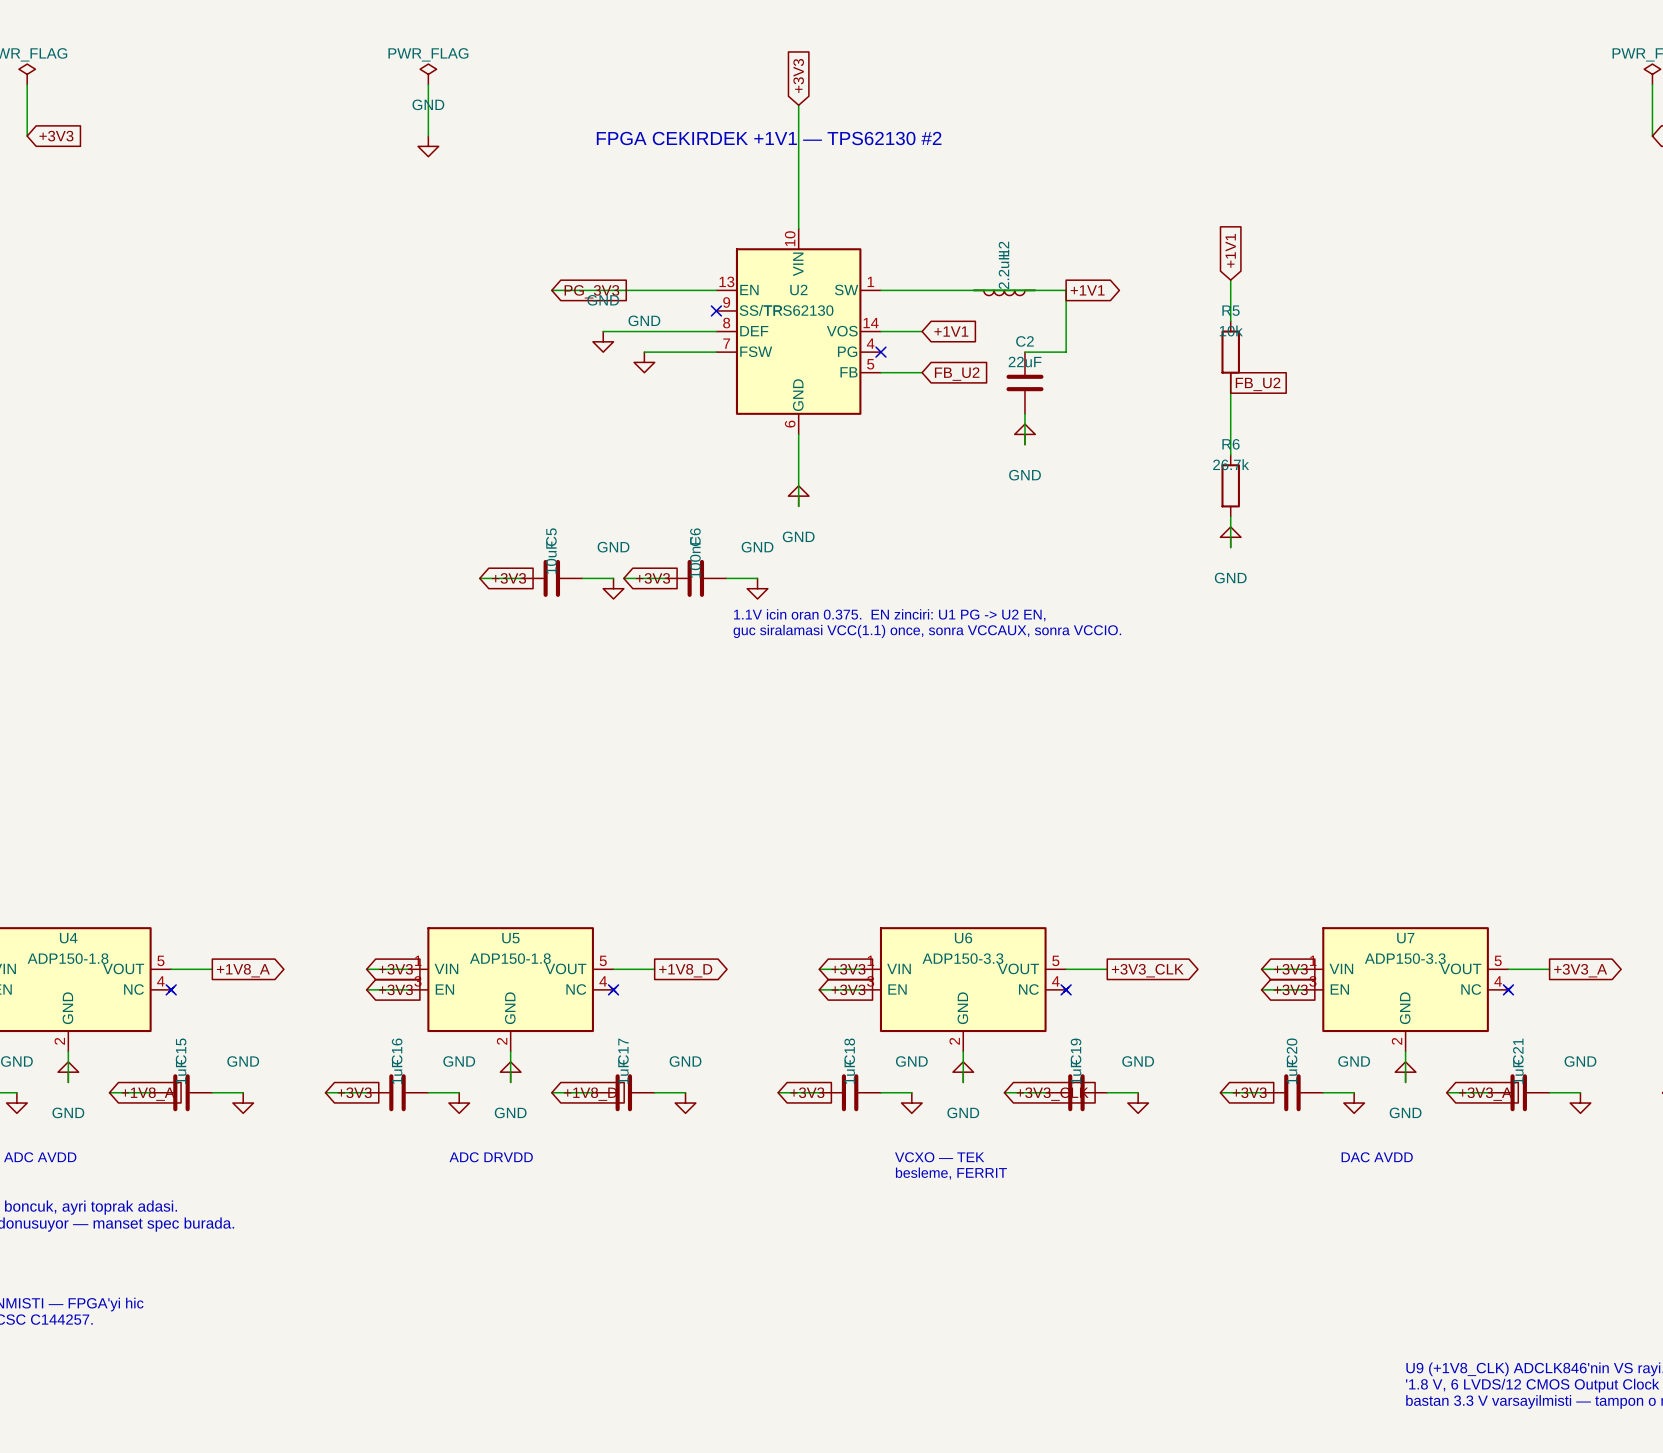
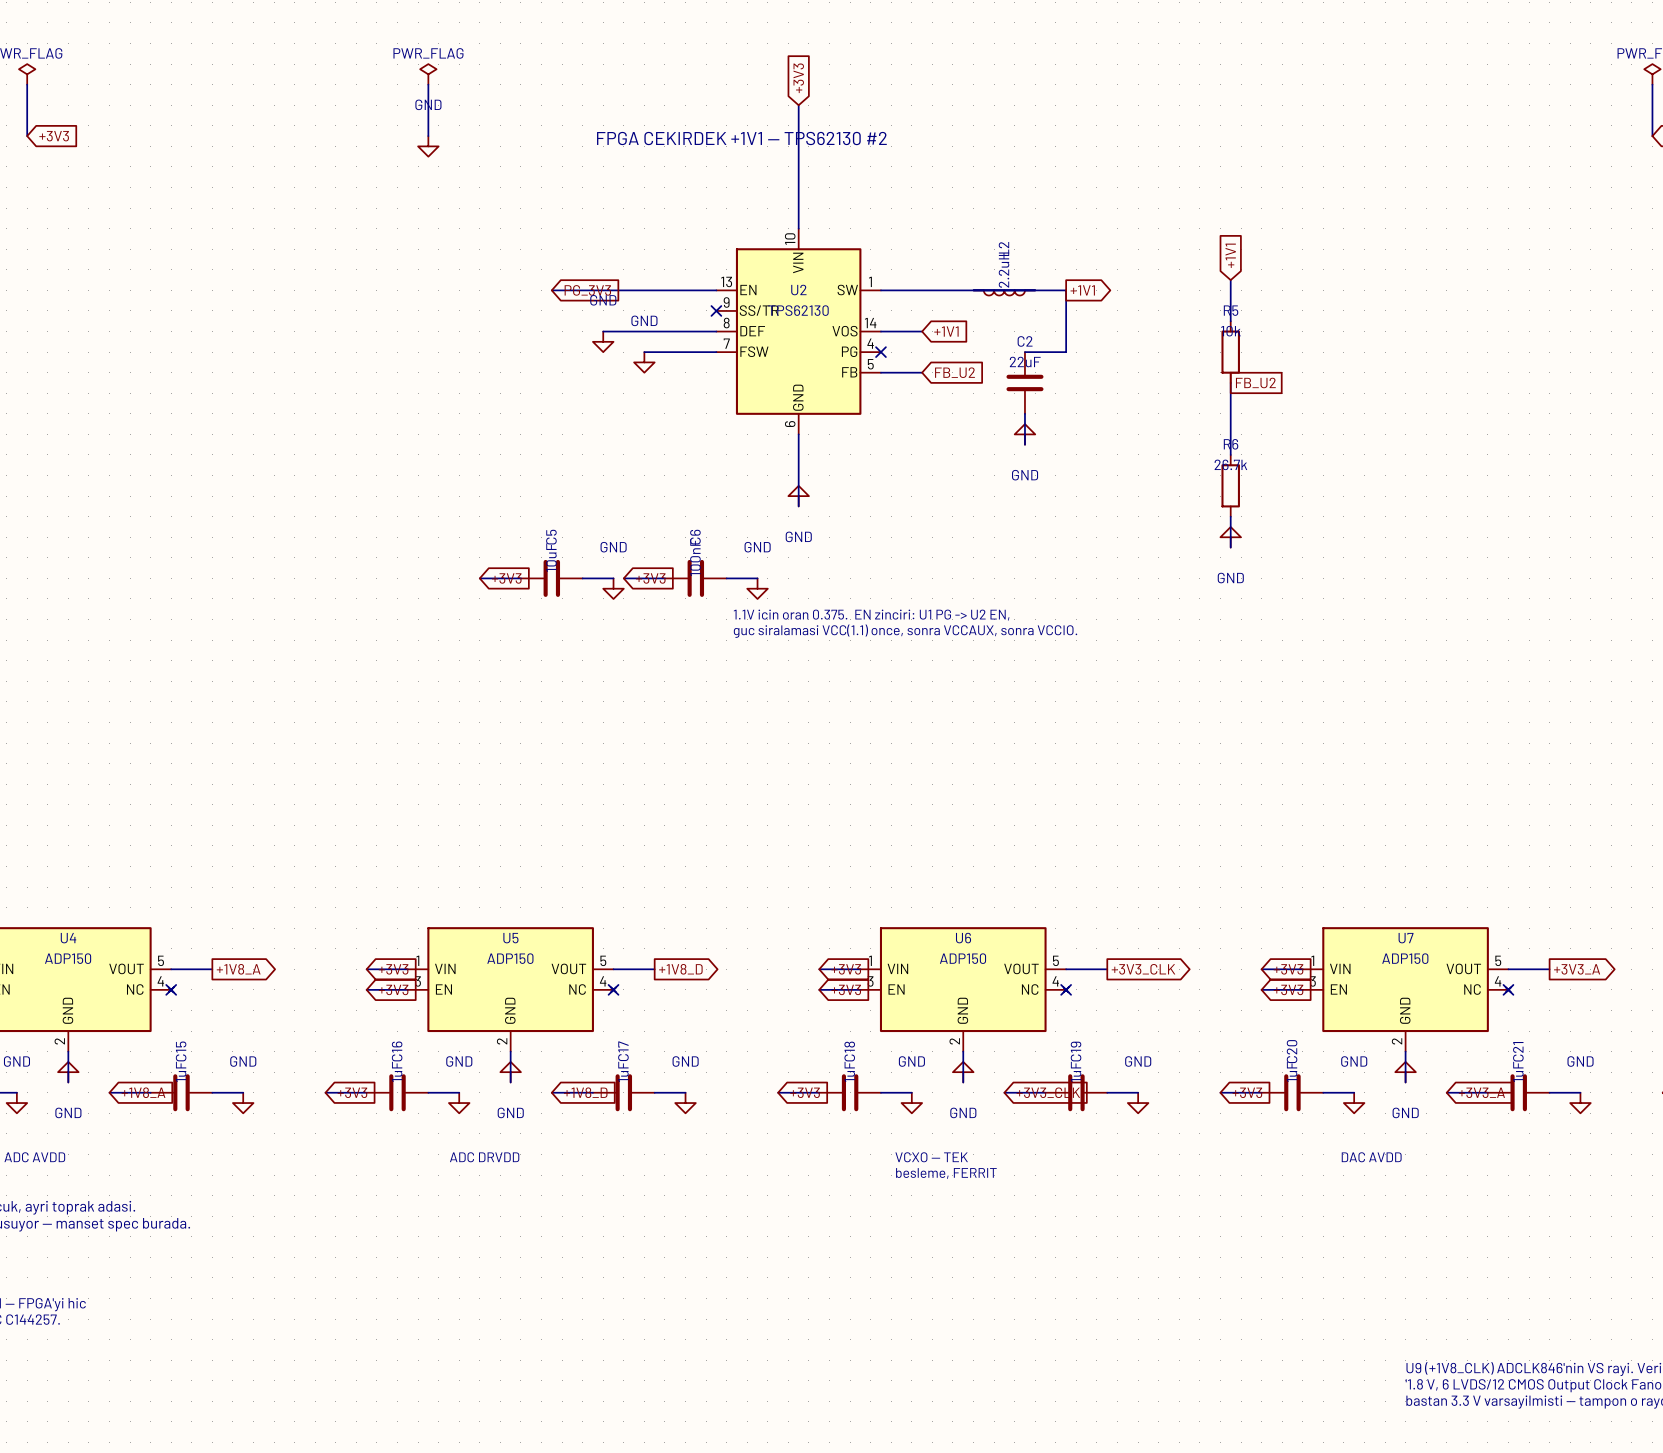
U4 value: ADP150-1.8 (68, 958) -> ADP150 (68, 958)
U5 value: ADP150-1.8 (510, 958) -> ADP150 (510, 958)
U6 value: ADP150-3.3 (962, 958) -> ADP150 (962, 958)
U7 value: ADP150-3.3 (1405, 958) -> ADP150 (1405, 958)

